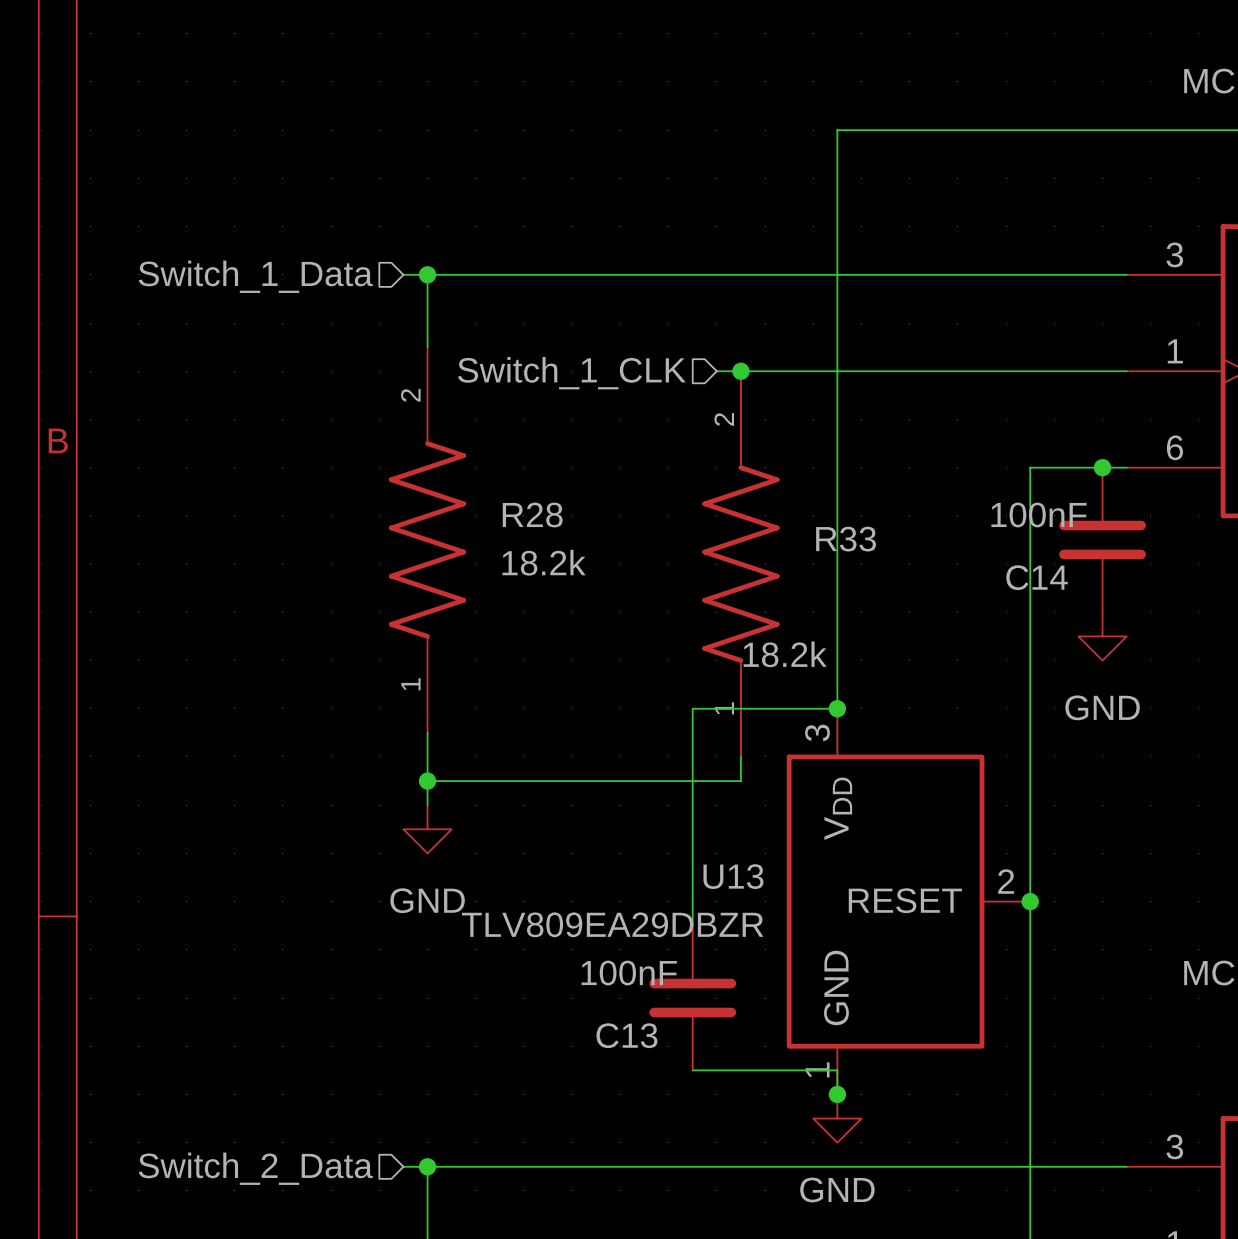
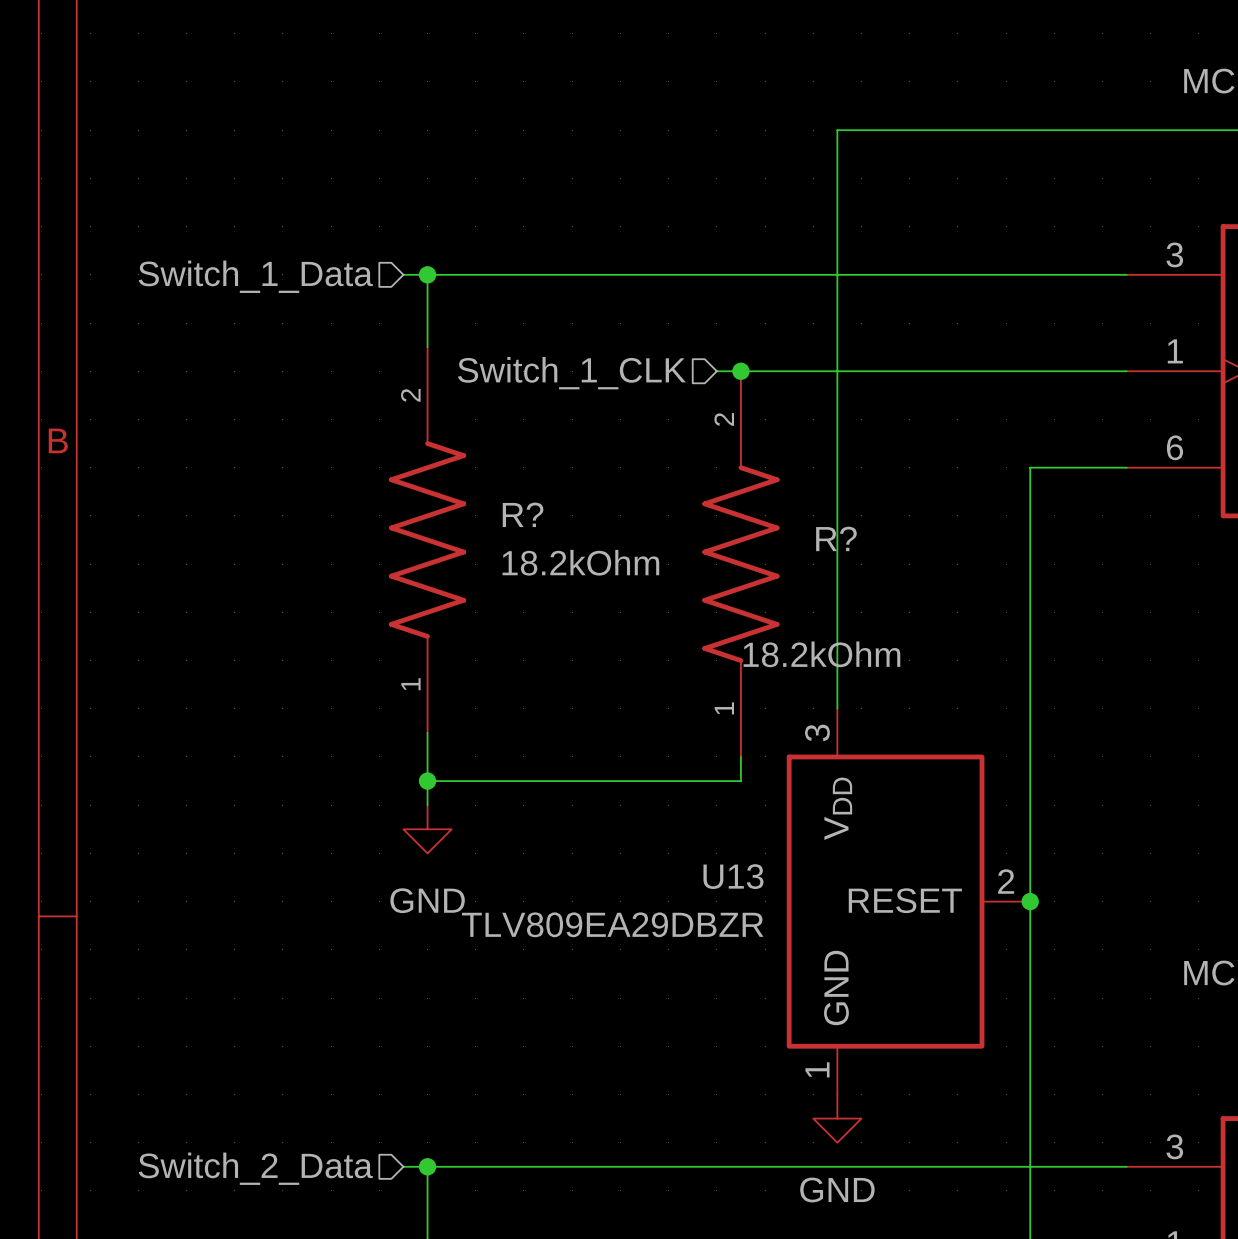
junction: (1102, 467) -> none
R28 name: R28 (532, 514) -> R? (523, 514)
R33 name: R33 (846, 539) -> R? (836, 538)
C14: 100nF (1102, 540) -> none
R28 value: 18.2k (544, 562) -> 18.2kOhm (580, 562)
power symbol: GND (1102, 636) -> none
R33 value: 18.2k (785, 654) -> 18.2kOhm (821, 654)
wire: (837, 708) (692, 708) (692, 925) -> none
junction: (837, 708) -> none
C13: 100nF (692, 998) -> none
wire: (692, 1070) (837, 1070) (837, 1094) -> none
junction: (837, 1094) -> none

